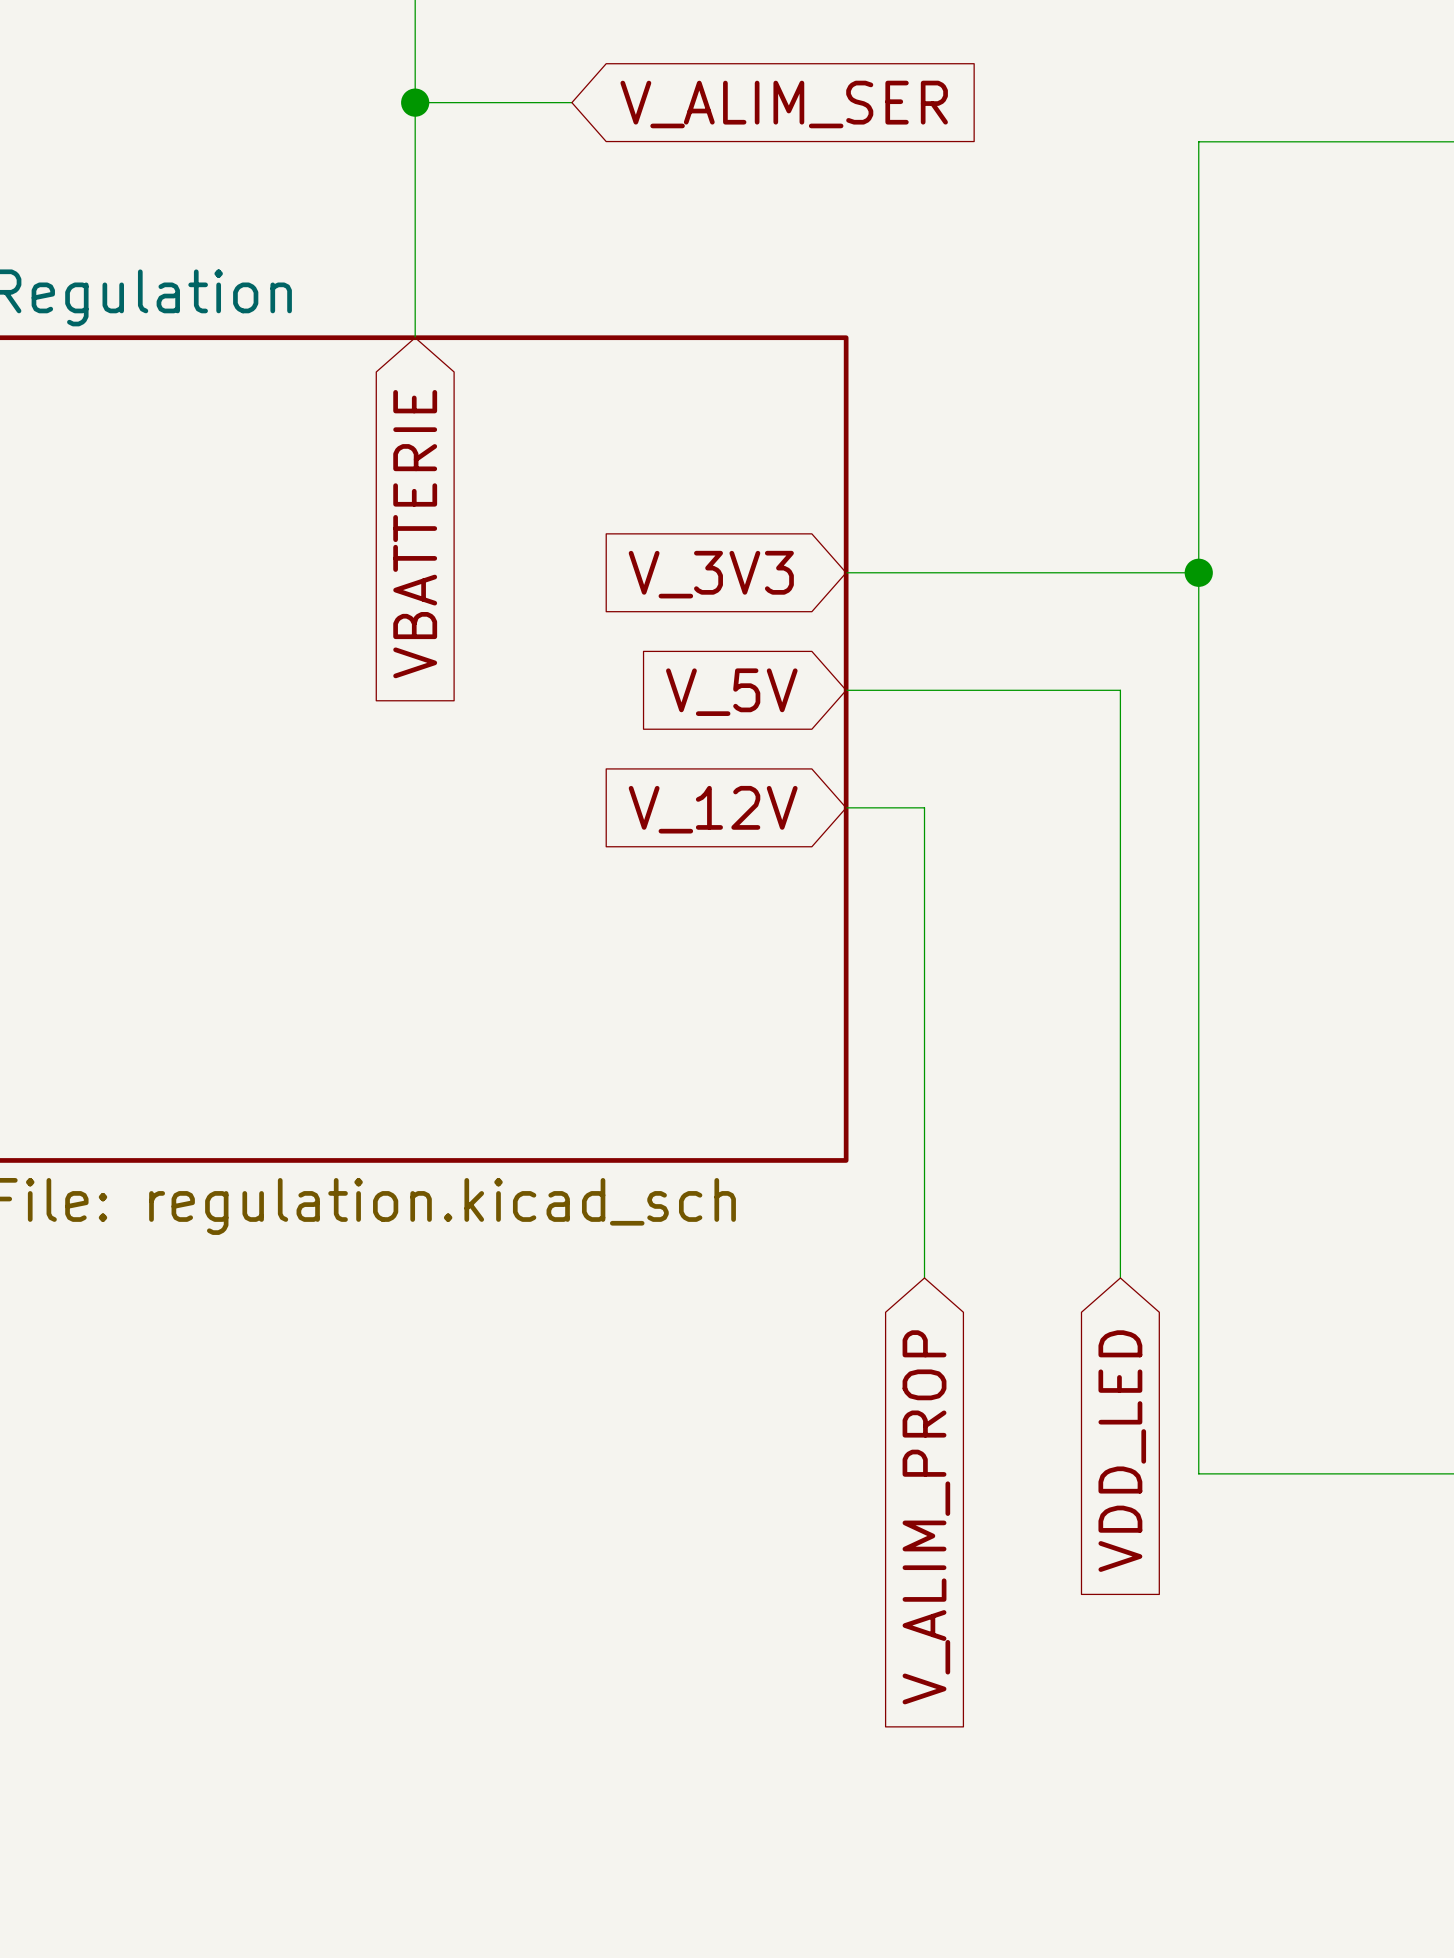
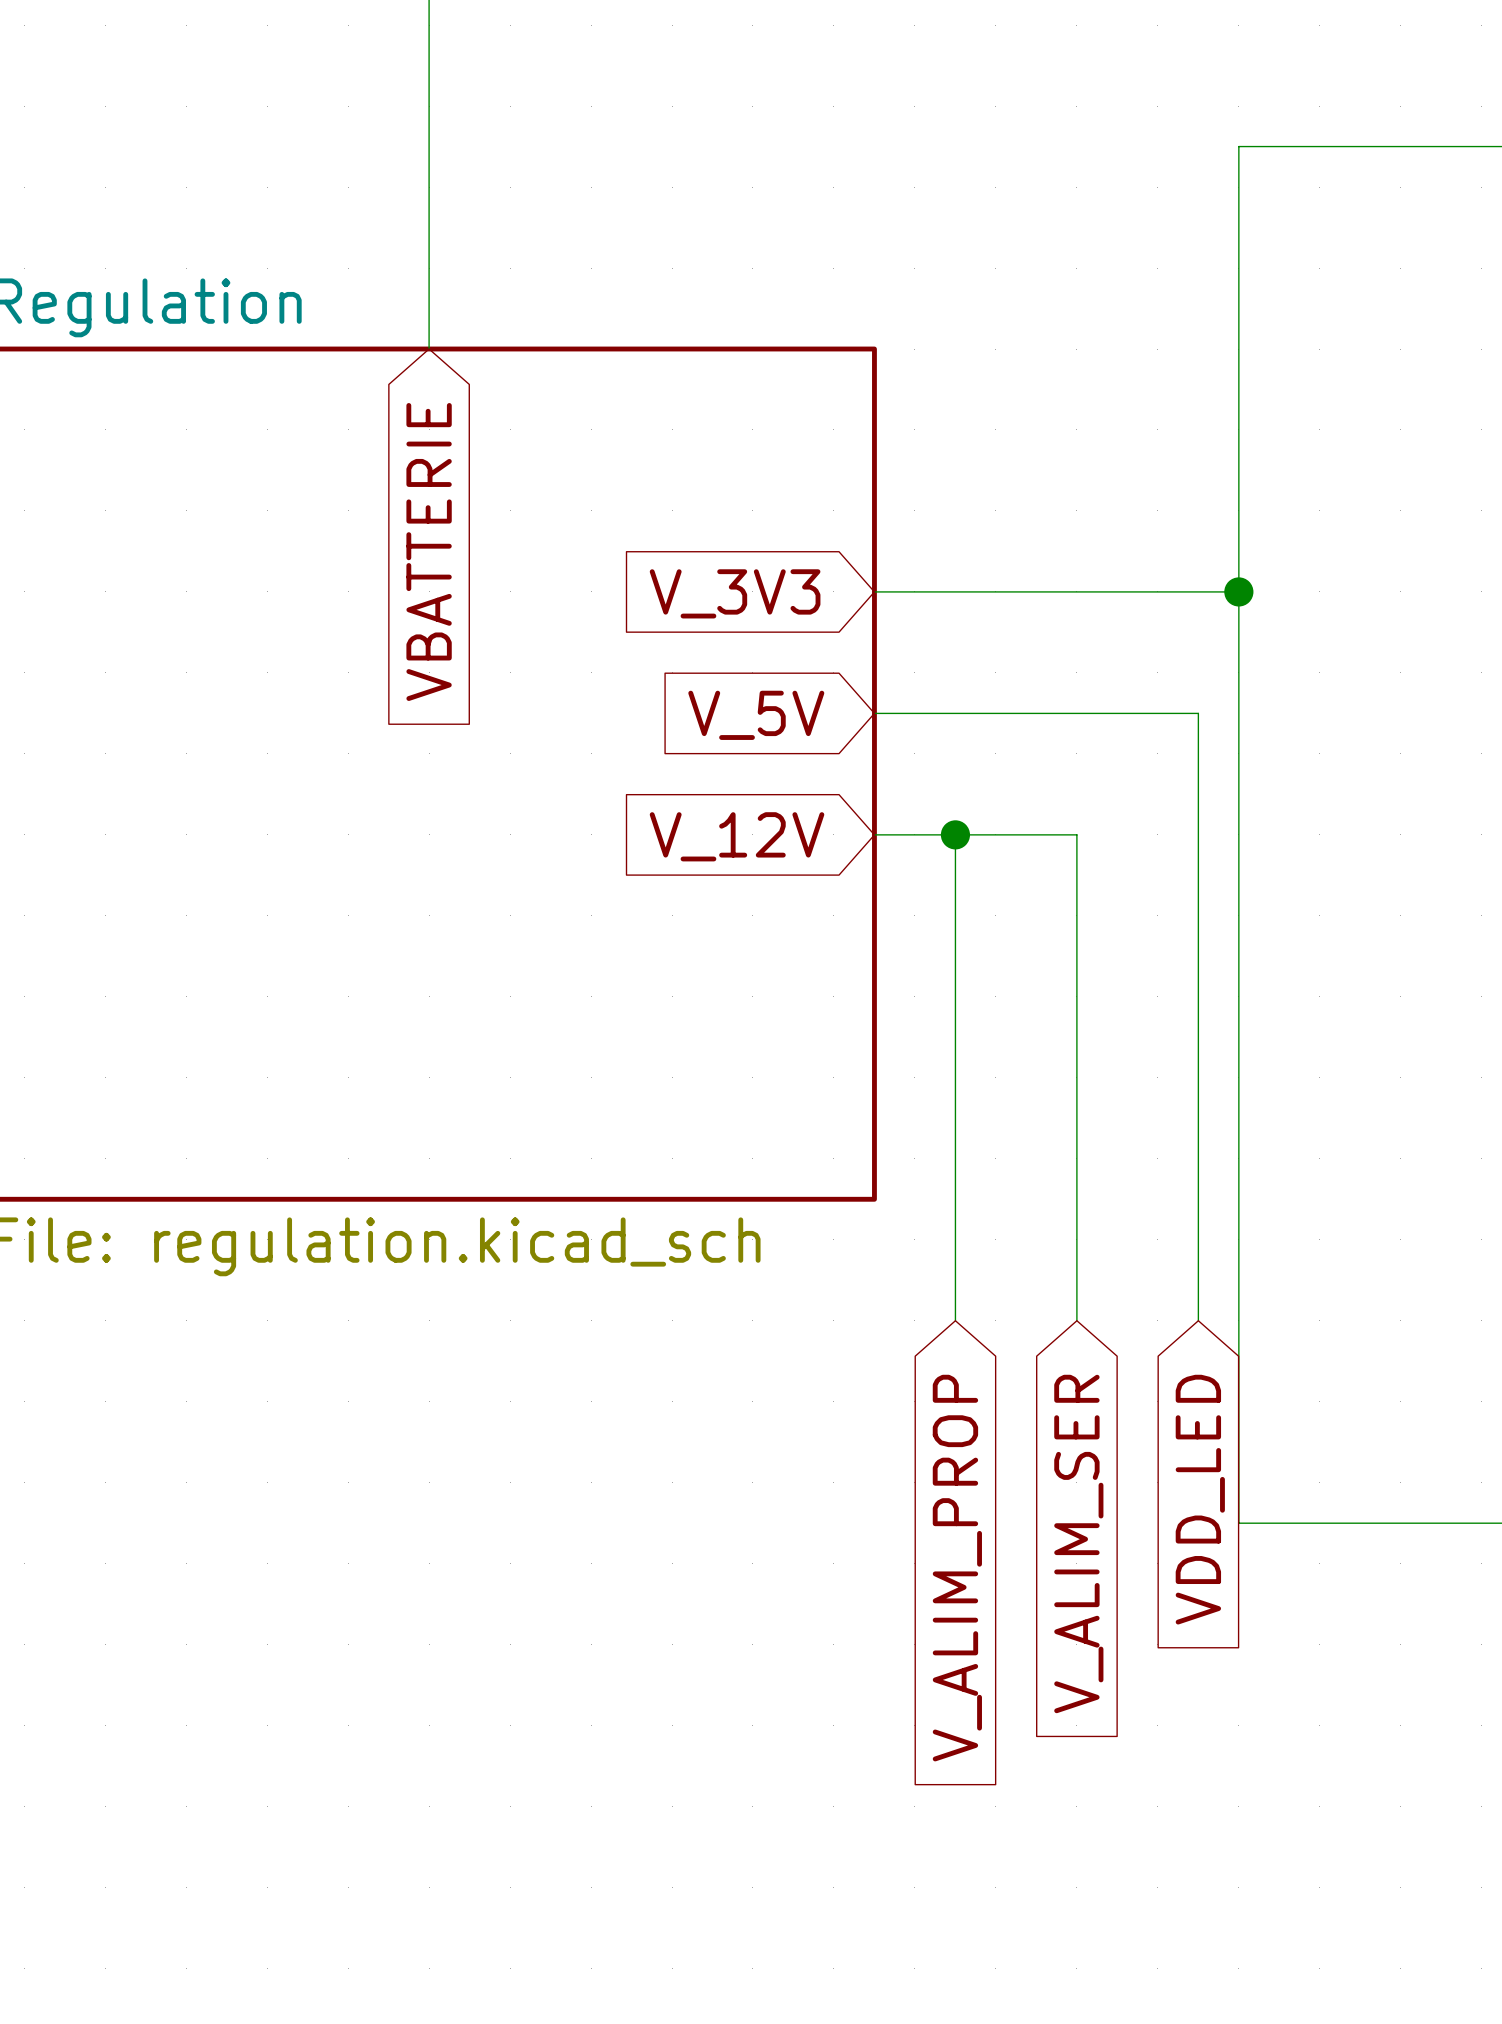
wire: (415, 102) (571, 102) -> none
junction: (415, 102) -> none
global label: V_ALIM_SER (784, 104) -> none
wire: (1120, 690) (1120, 1277) -> (1157, 713) (1198, 713) (1198, 1320)
wire: none -> (955, 834) (1076, 834) (1076, 1320)
junction: none -> (955, 834)
global label position: VDD_LED (1122, 1451) -> VDD_LED (1200, 1499)
global label: none -> V_ALIM_SER (1078, 1543)

